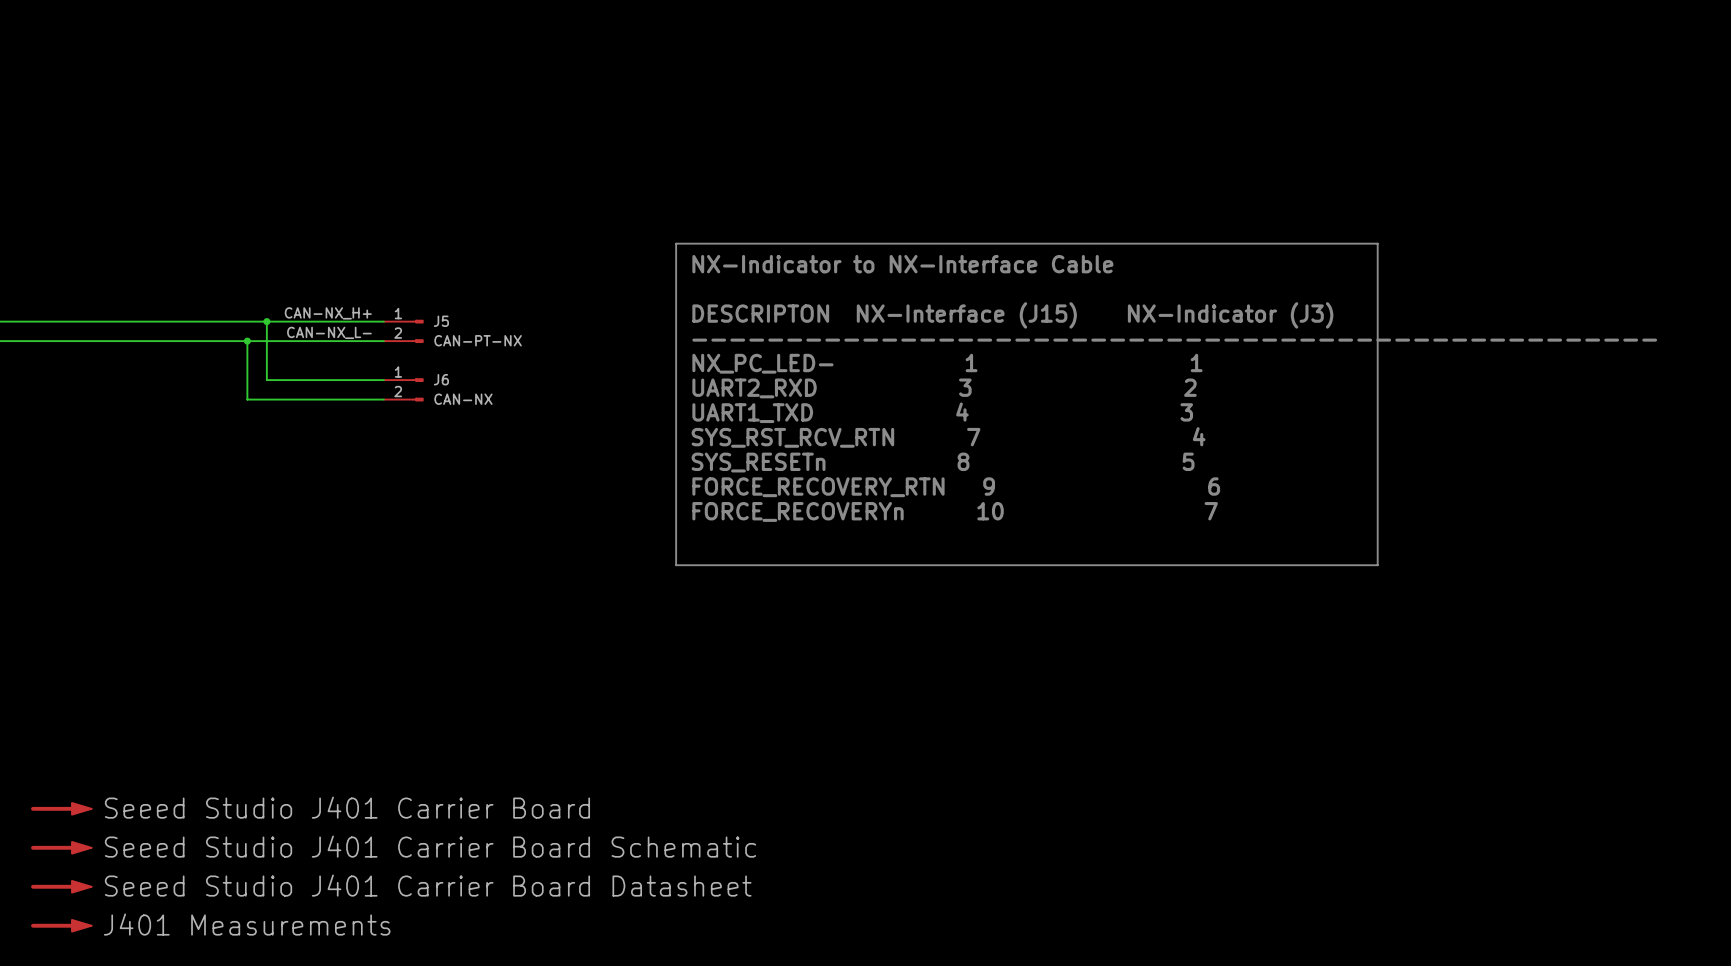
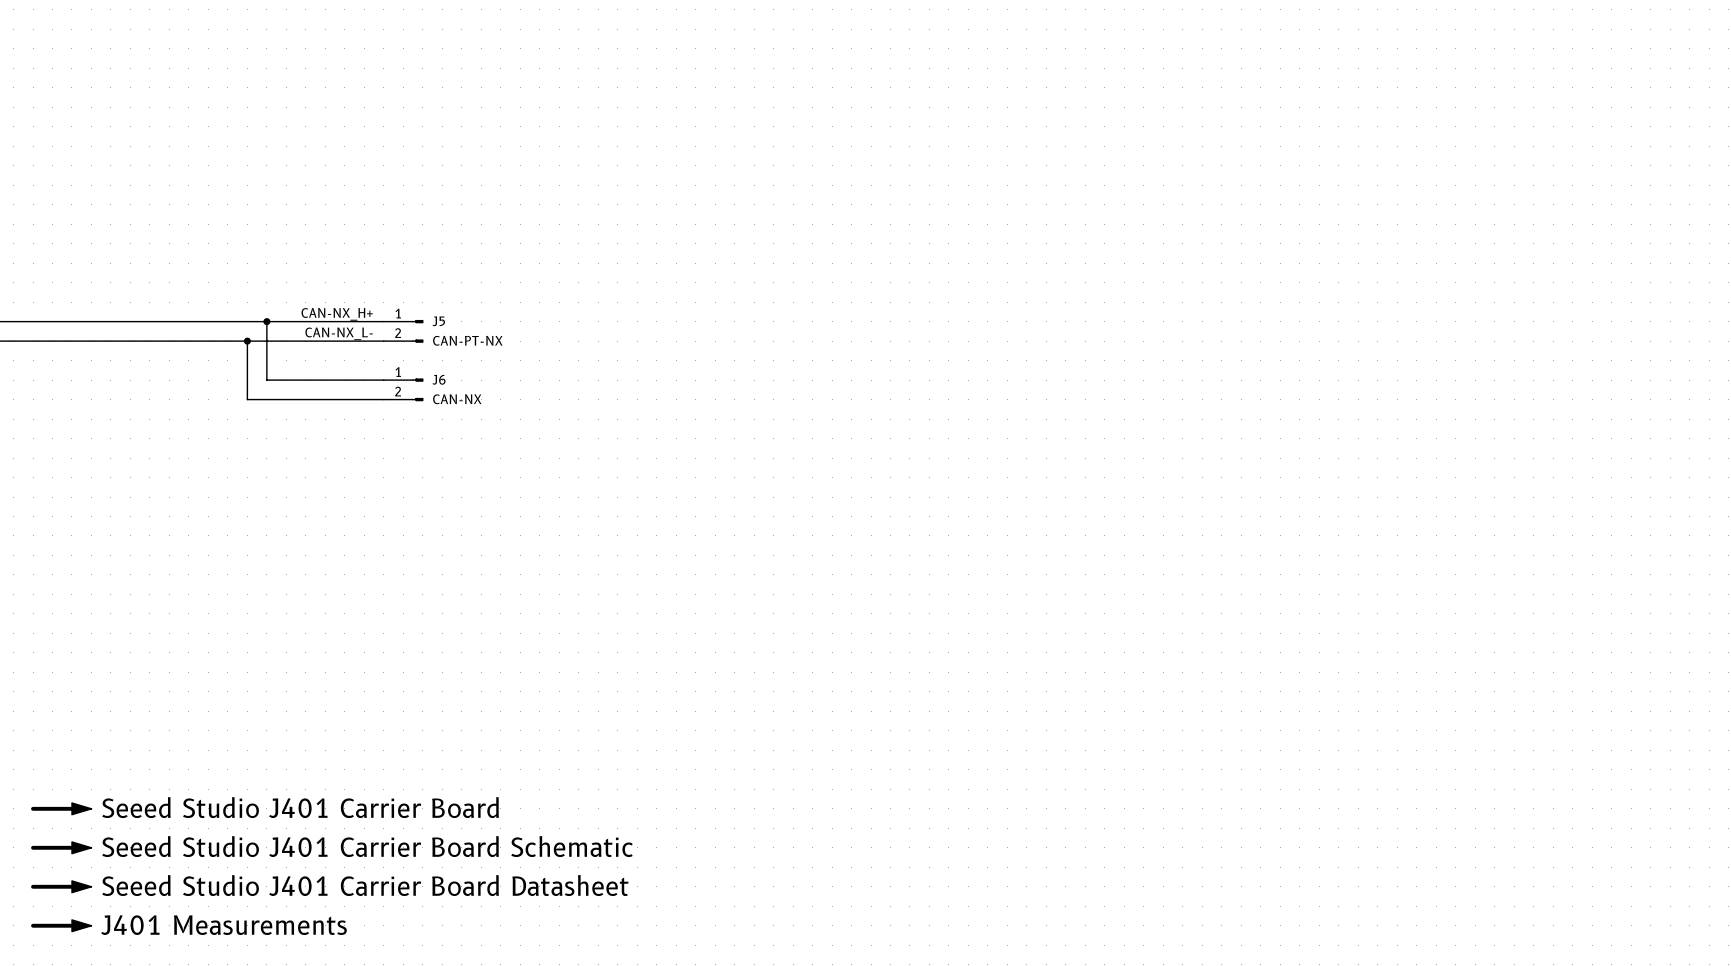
line: (676, 243) (1377, 243) (1377, 565) (676, 565) (676, 243) -> none
text: NX-Indicator to NX-Interface Cable (902, 264) -> none
text: DESCRIPTON NX-Interface (J15) NX-Indicator (J3) (1012, 315) -> none
text: --------------------------------------------------- (1174, 340) -> none
text: NX_PC_LED- 1 1 (947, 363) -> none
text: UART2_RXD 3 2 (944, 388) -> none
text: UART1_TXD 4 3 (942, 412) -> none
text: SYS_RST_RCV_RTN 7 4 (948, 437) -> none
text: SYS_RESETn 8 5 (943, 462) -> none
text: FORCE_RECOVERY_RTN 9 6 (956, 487) -> none
text: FORCE_RECOVERYn 10 7 (955, 511) -> none

